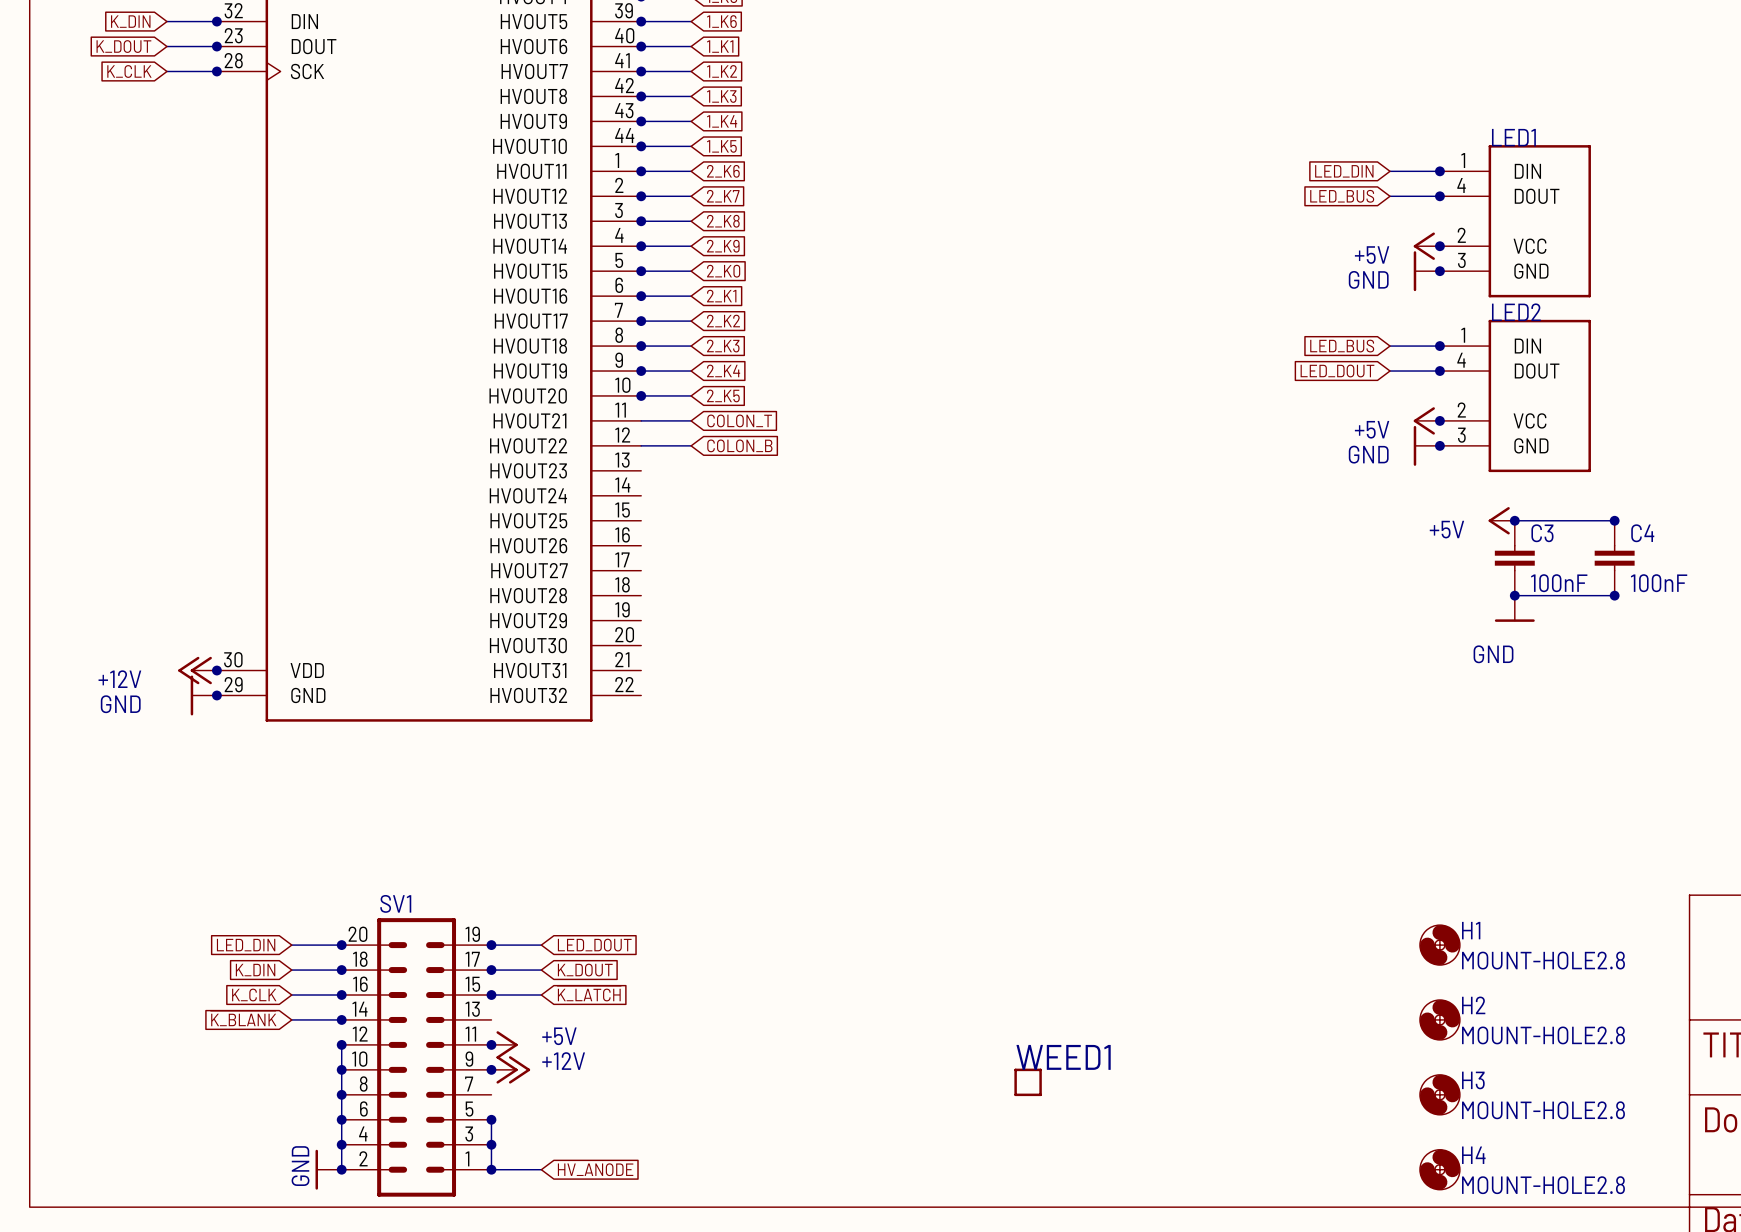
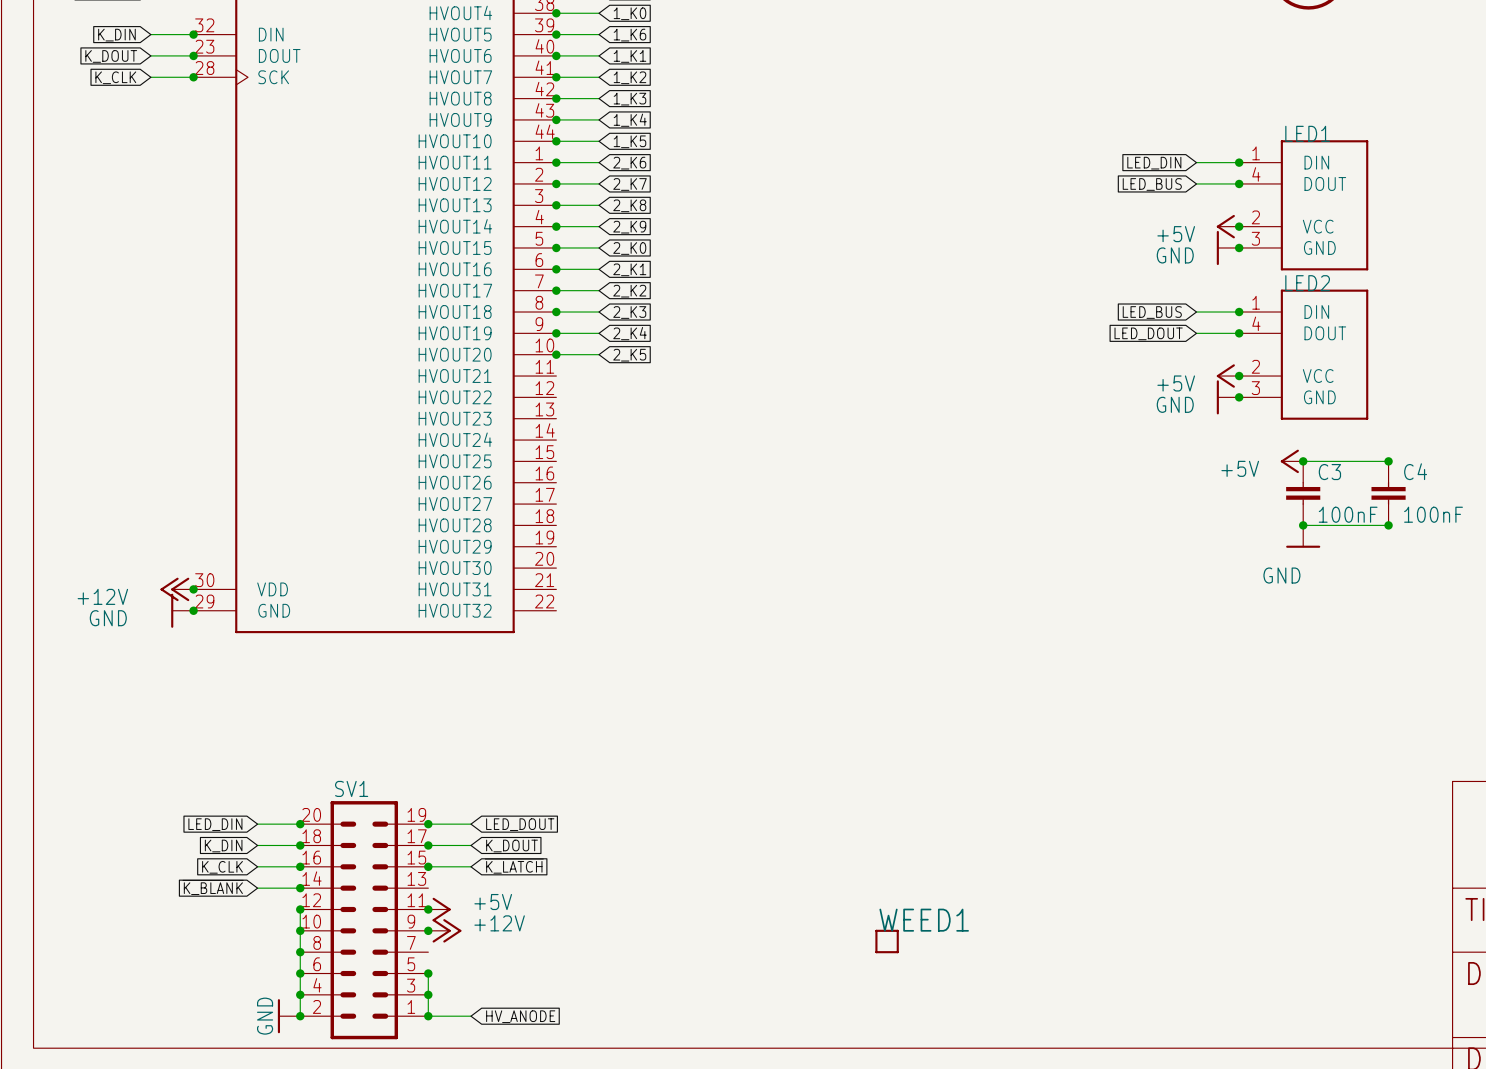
wire: (641, 420) (691, 420) -> none
global label: COLON_T (739, 420) -> none
wire: (641, 445) (691, 445) -> none
global label: COLON_B (739, 445) -> none
H1: MOUNT-HOLE2.8 (1439, 945) -> none
H2: MOUNT-HOLE2.8 (1439, 1019) -> none
H3: MOUNT-HOLE2.8 (1439, 1094) -> none
H4: MOUNT-HOLE2.8 (1439, 1169) -> none

